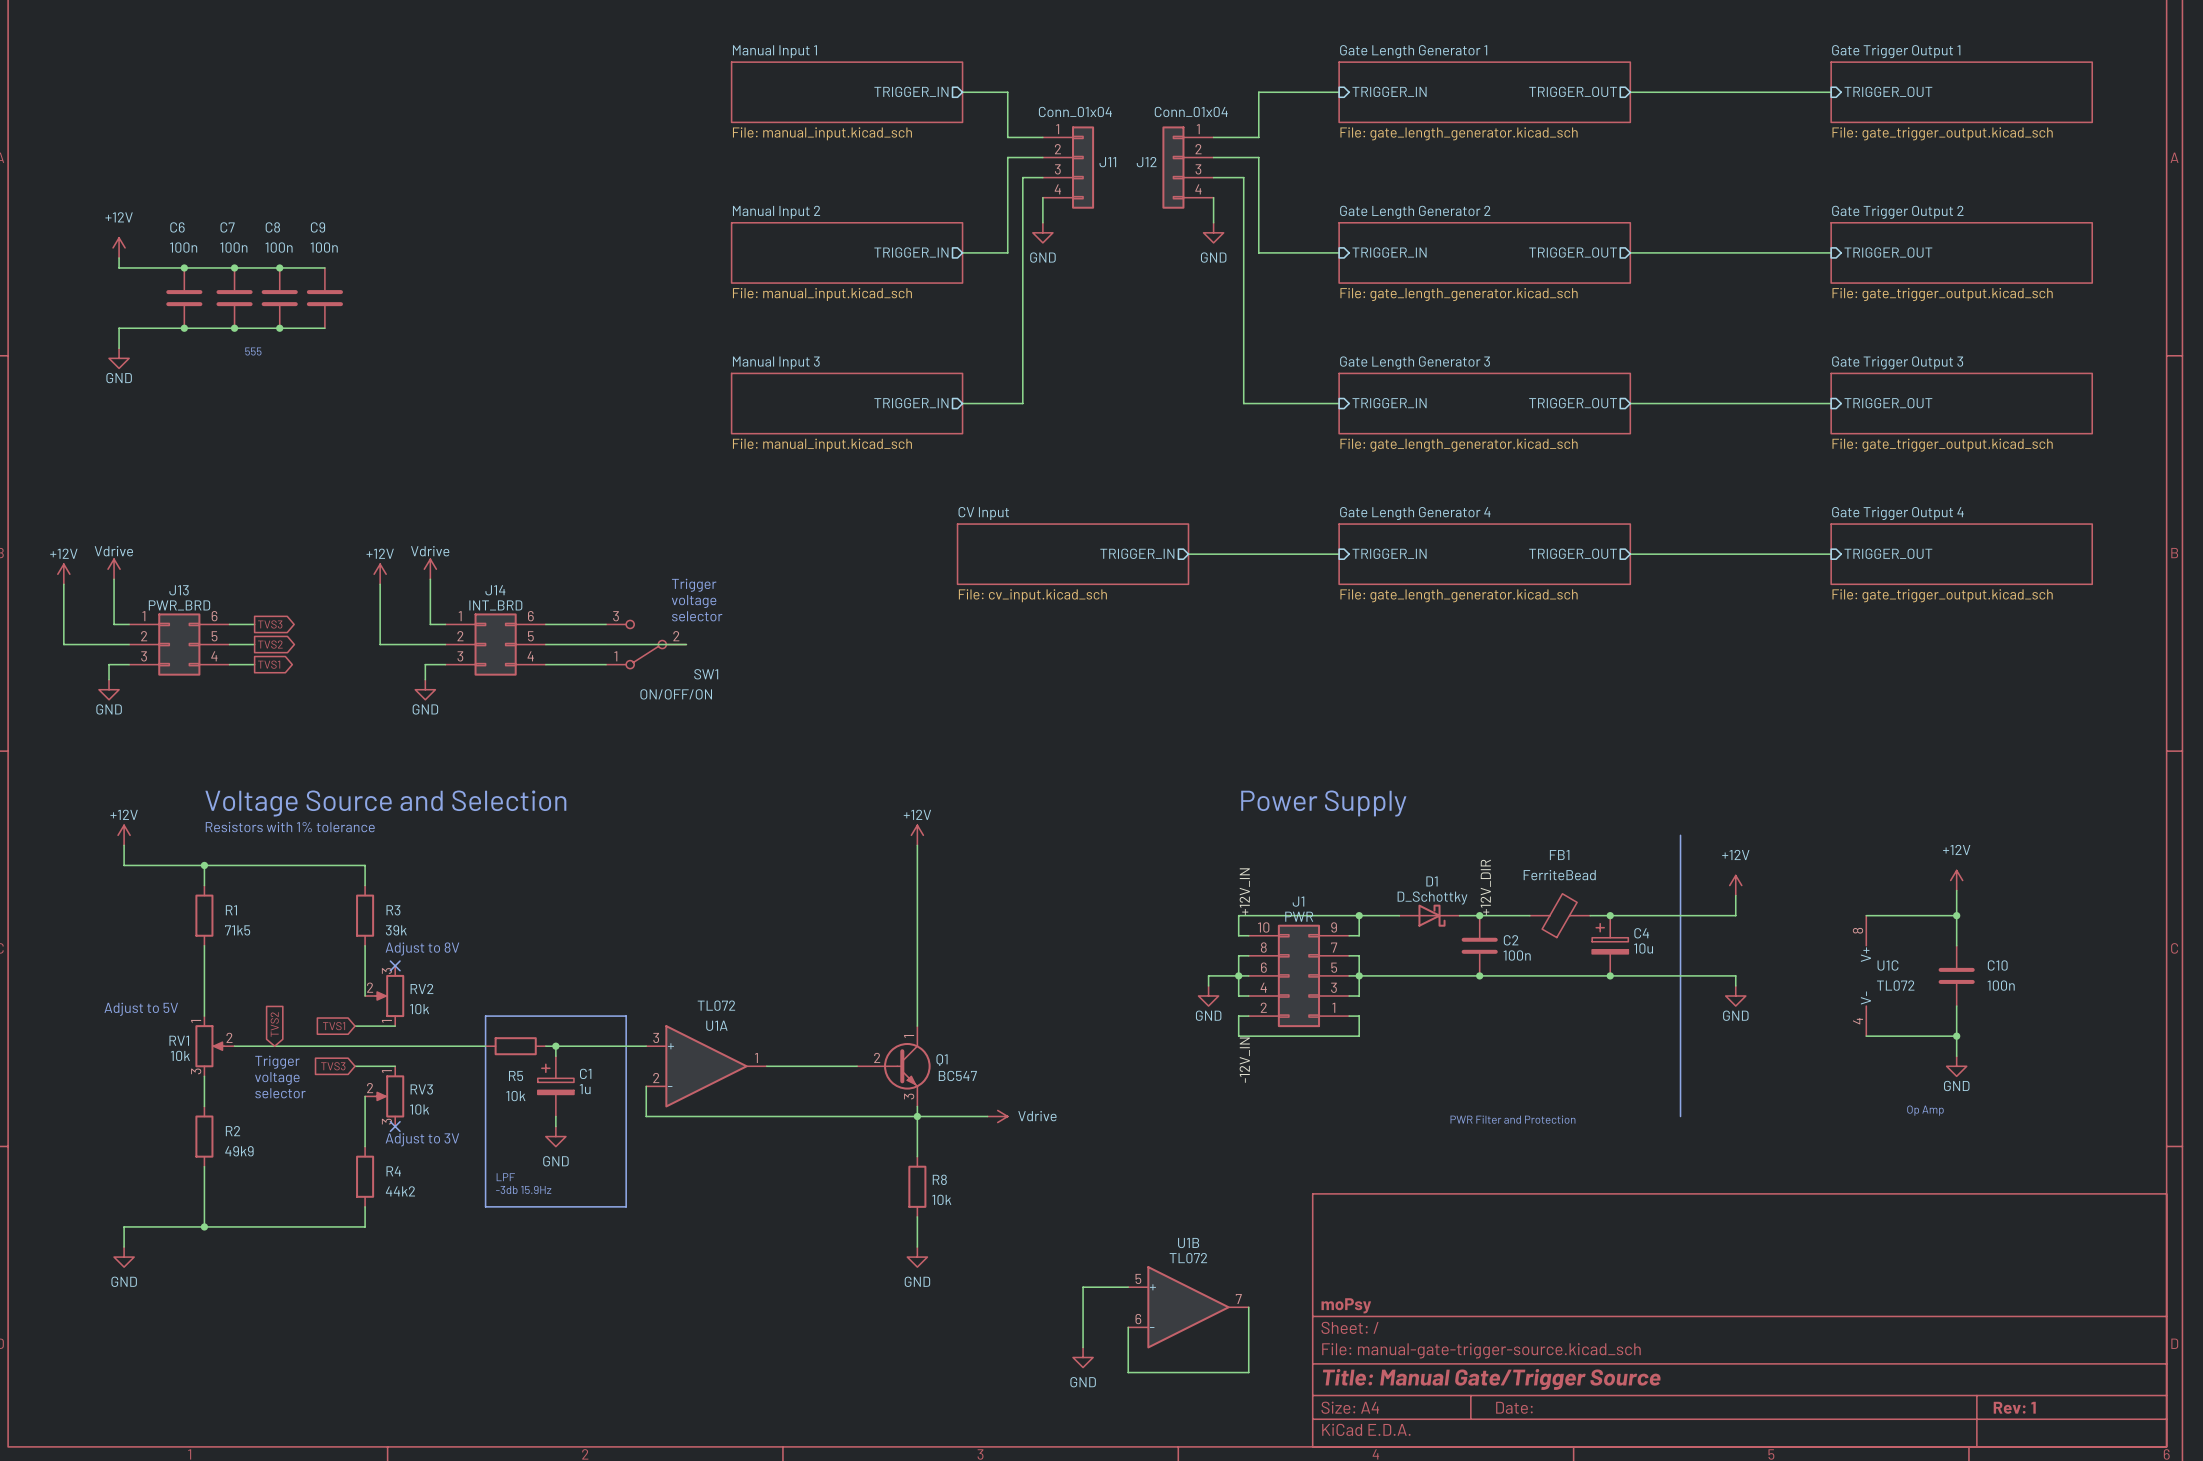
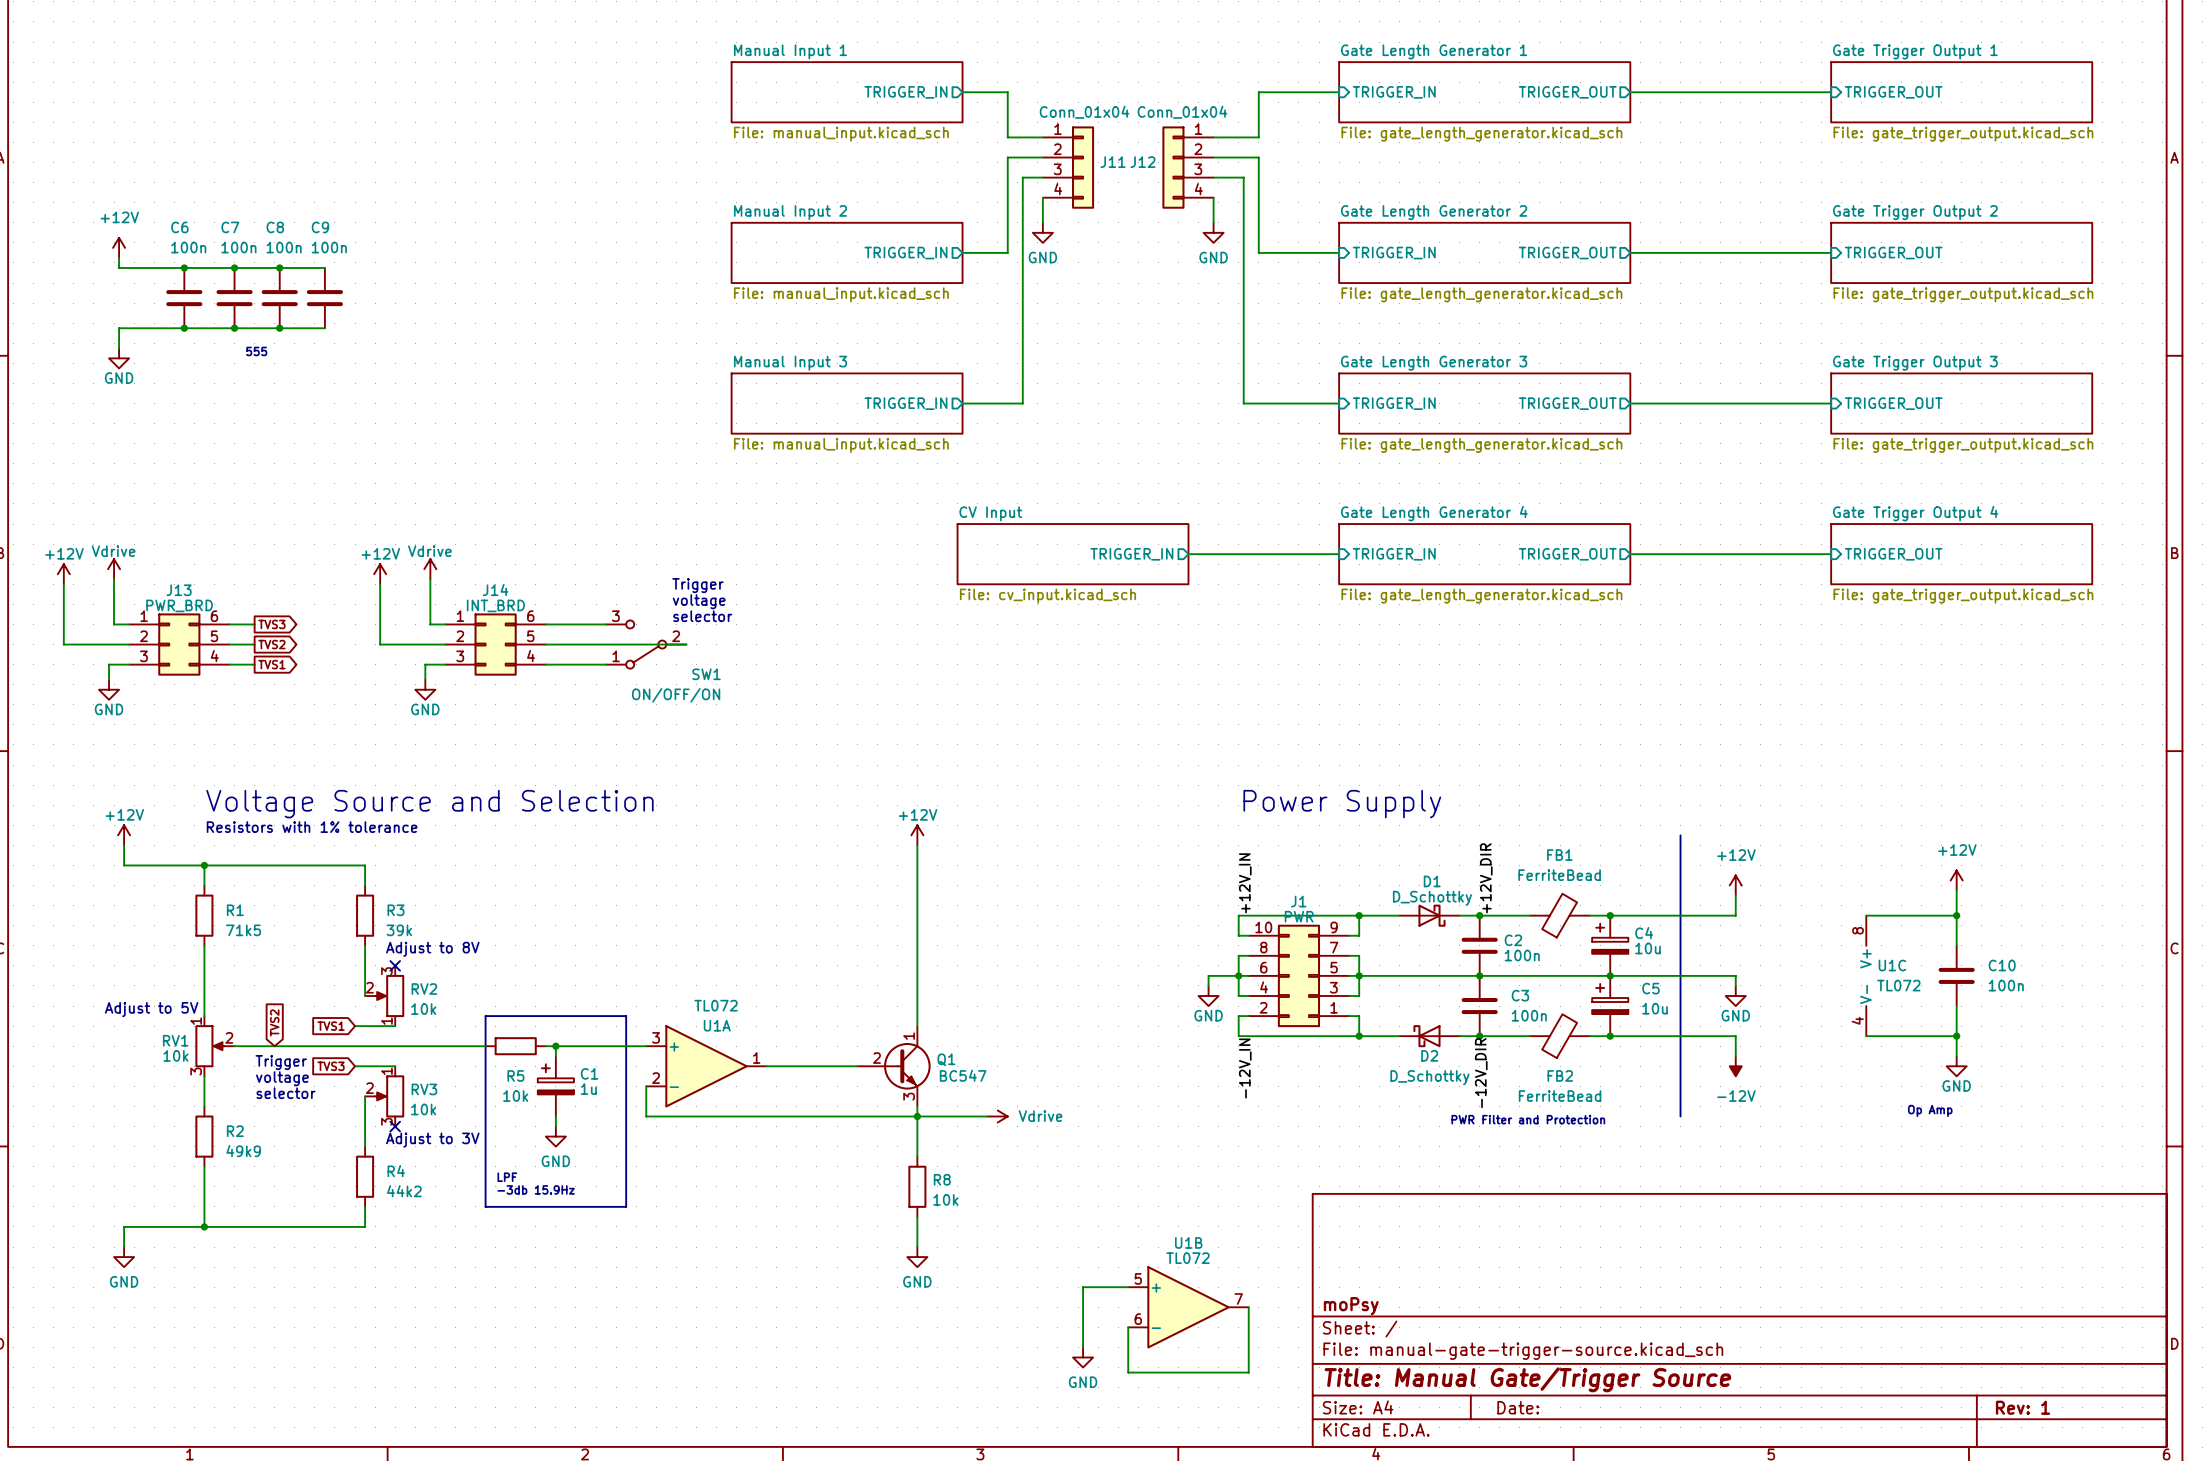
C3: none -> 100n (1479, 1006)
C5: none -> 10u (1610, 1006)
wire: none -> (1359, 1036) (1399, 1036)
junction: none -> (1359, 1036)
D2: none -> D_Schottky (1429, 1036)
wire: none -> (1459, 1036) (1529, 1036)
junction: none -> (1479, 1036)
FB2: none -> FerriteBead (1560, 1036)
wire: none -> (1590, 1036) (1735, 1036) (1735, 1056)
junction: none -> (1610, 1036)
label: none -> -12V_DIR (1481, 1073)
power symbol: none -> -12V (1735, 1066)

